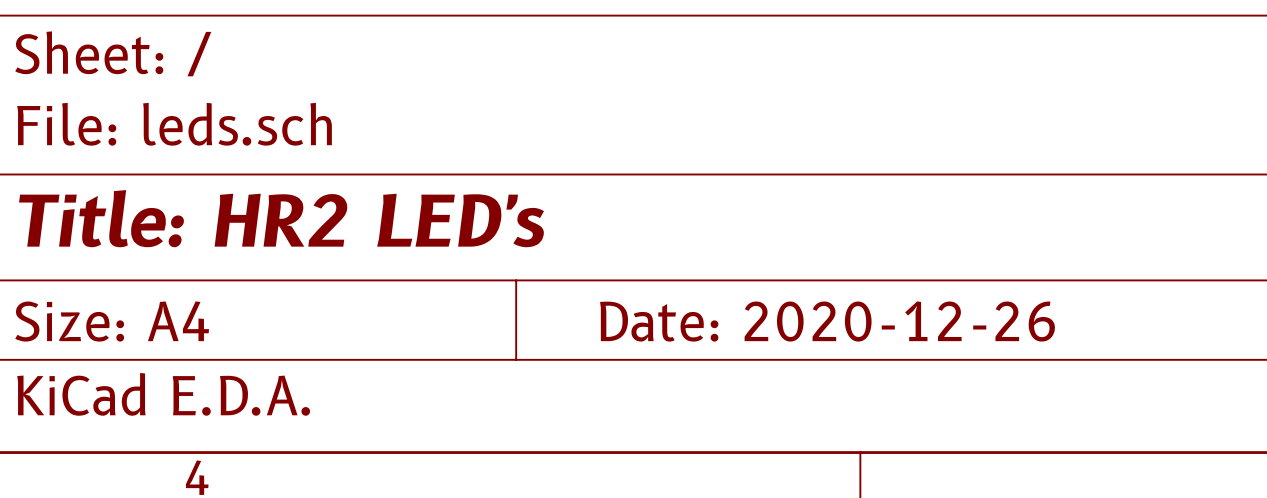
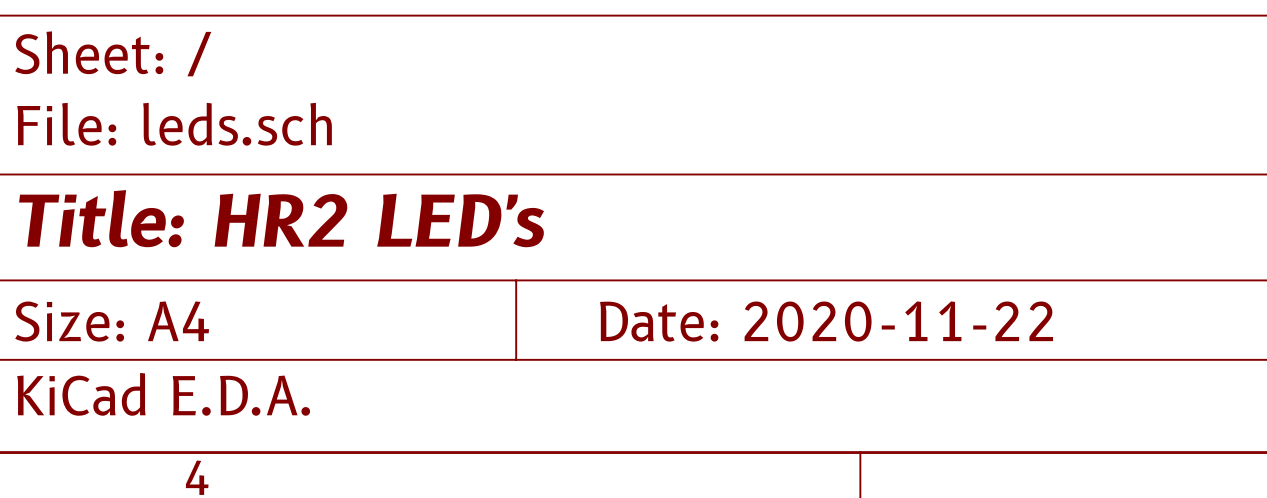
title block: Date: 2020-12-26 (827, 321) -> Date: 2020-11-22 (826, 321)

